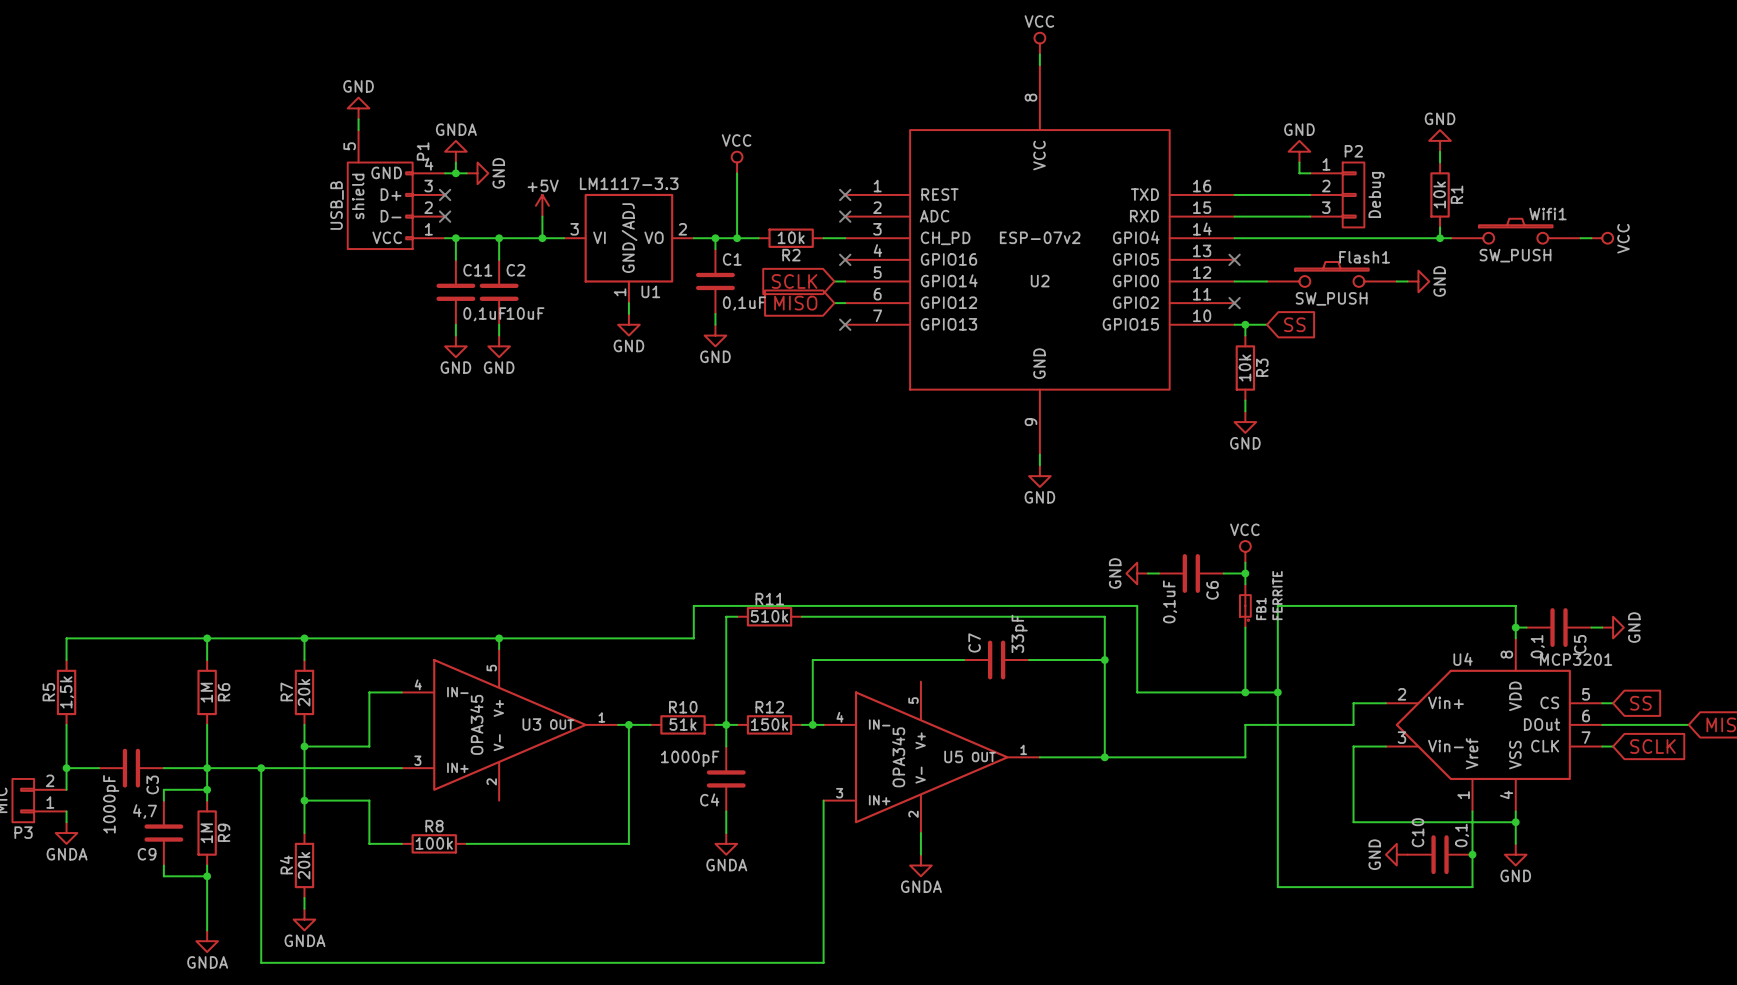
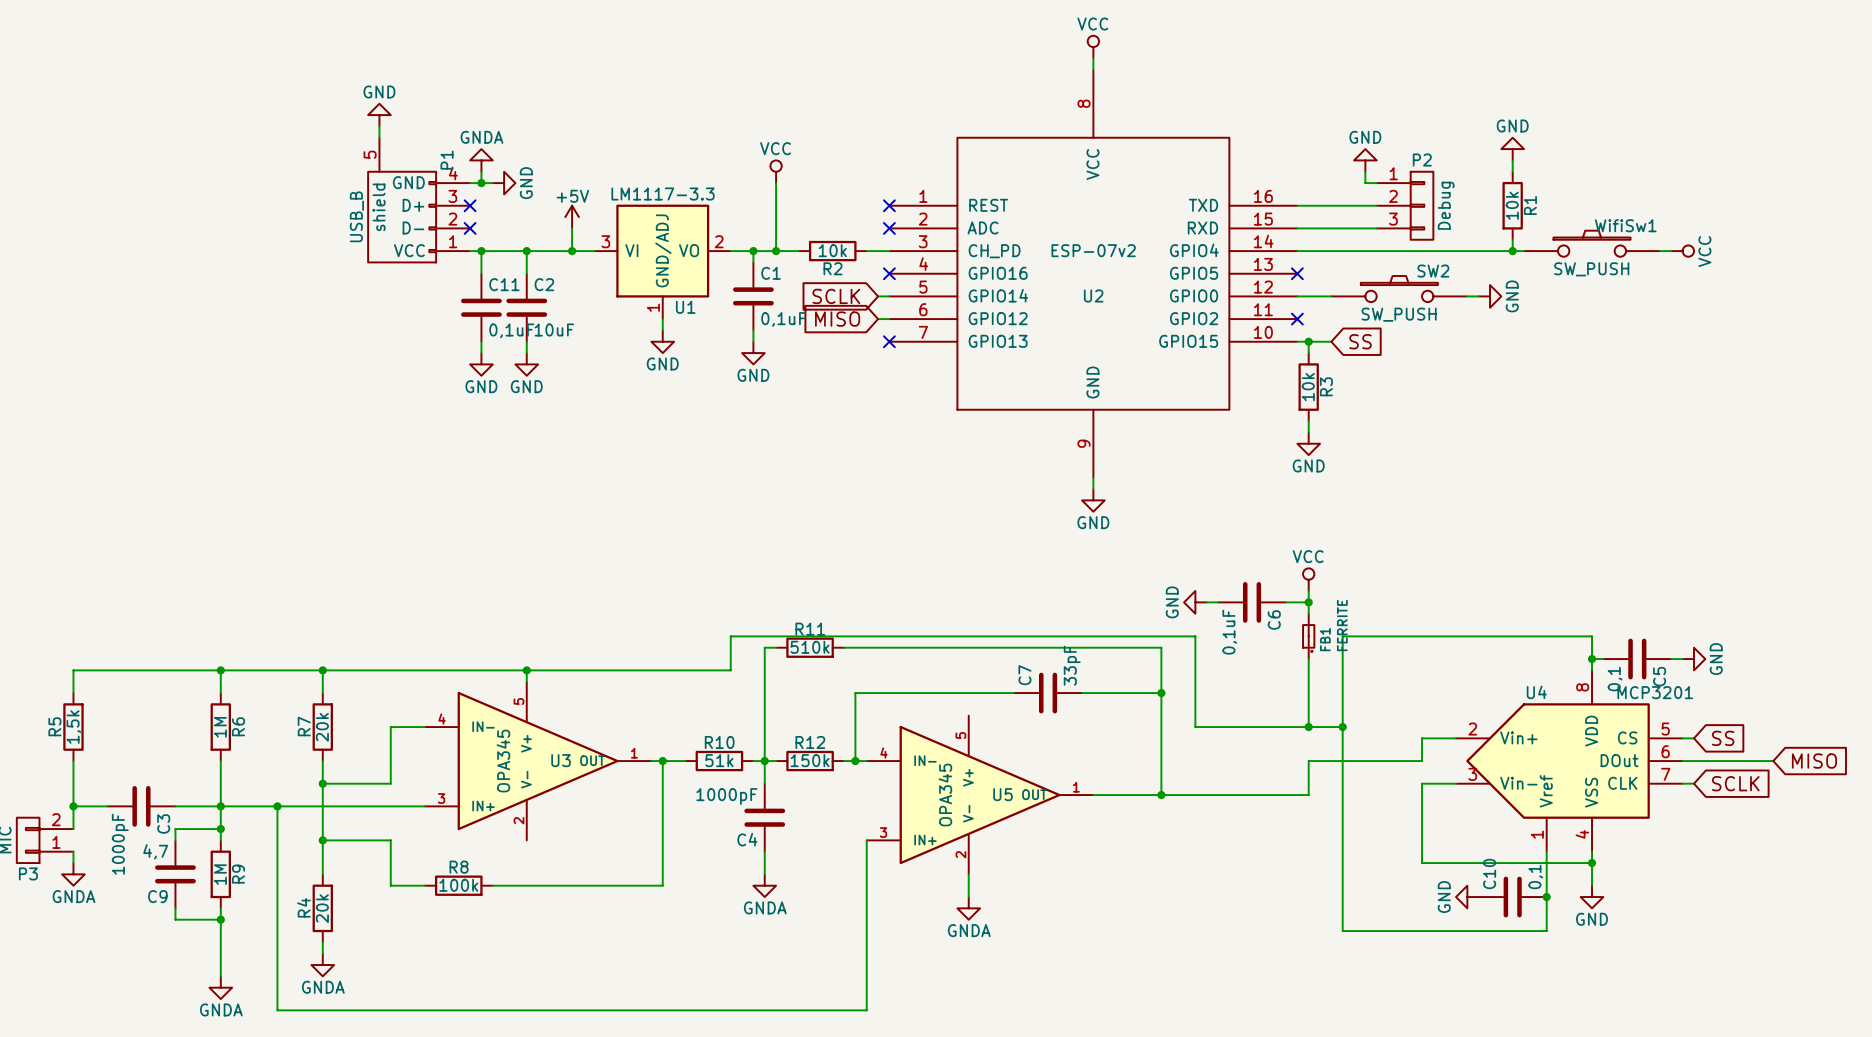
Wifi1 name: Wifi1 (1547, 214) -> WifiSw1 (1625, 225)
Flash1 name: Flash1 (1364, 257) -> SW2 (1433, 271)

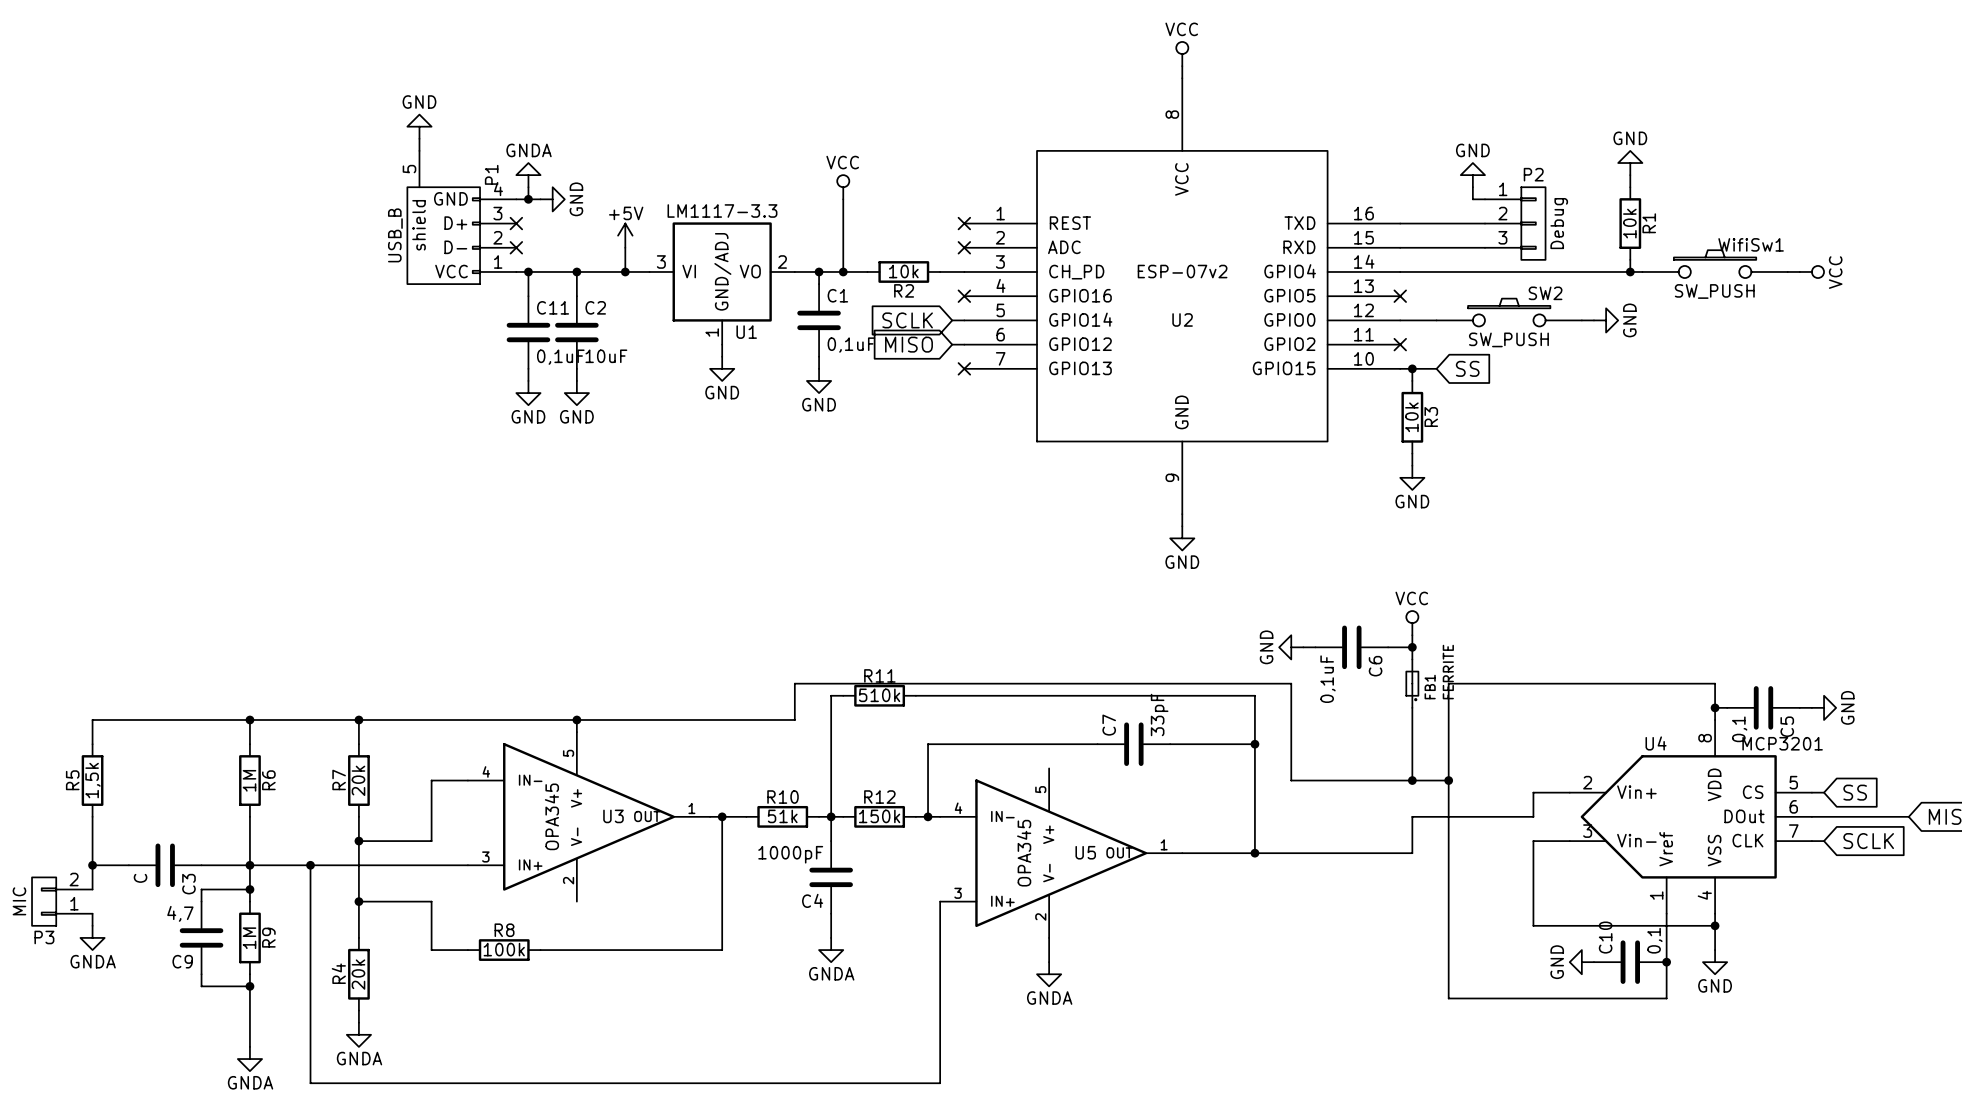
C3 value: 1000pF (120, 844) -> C (140, 878)

